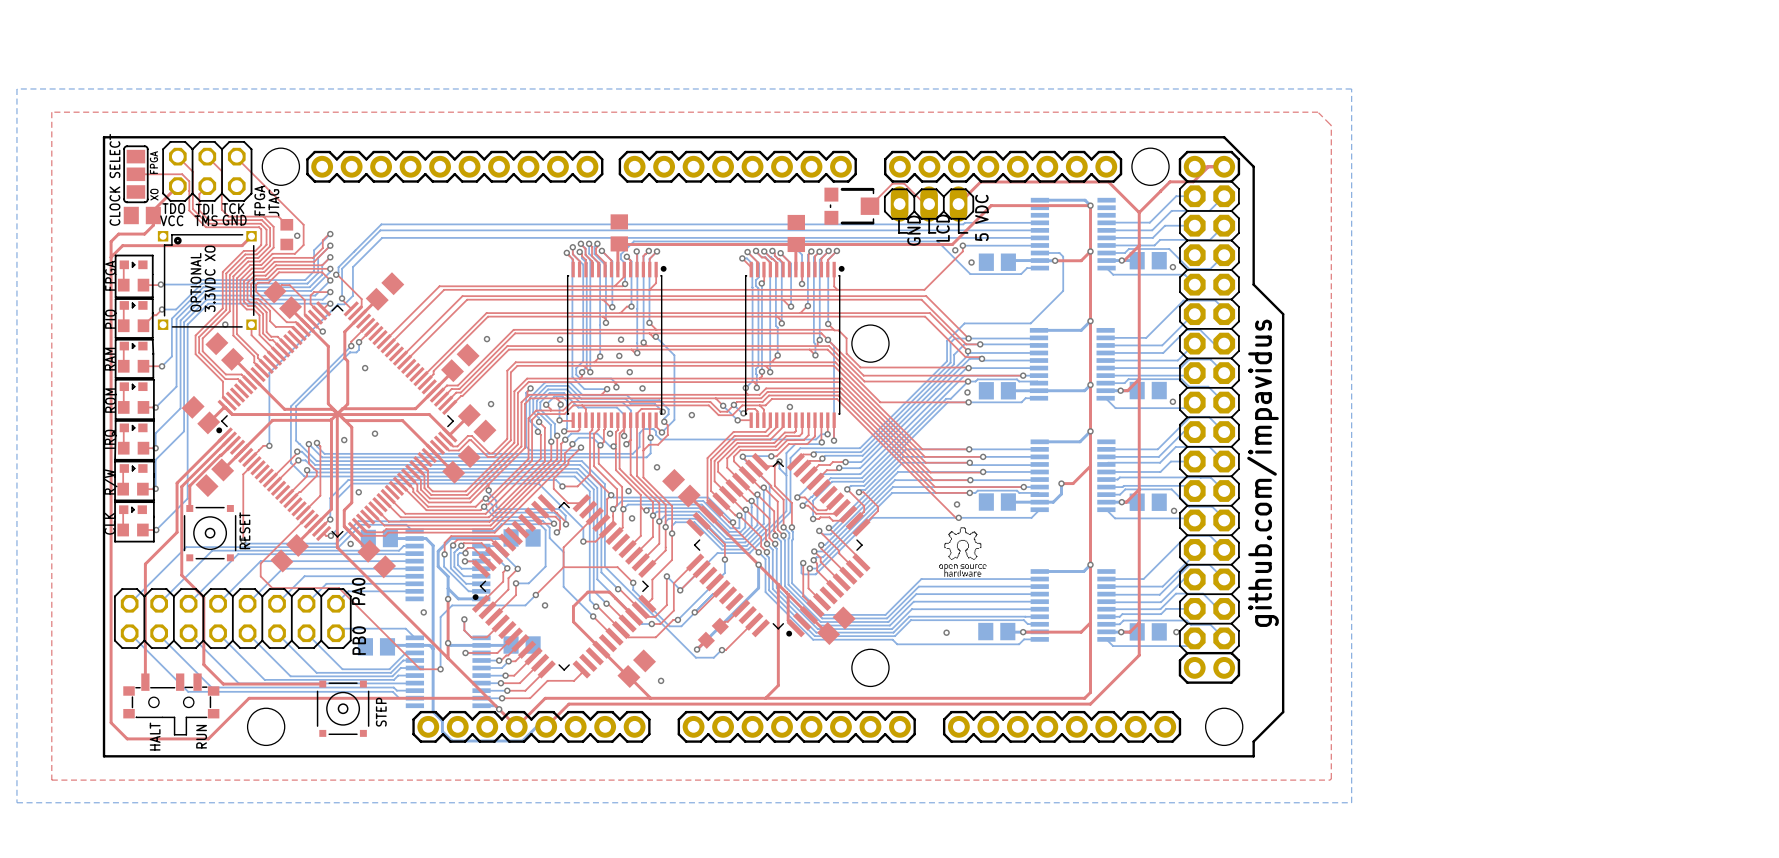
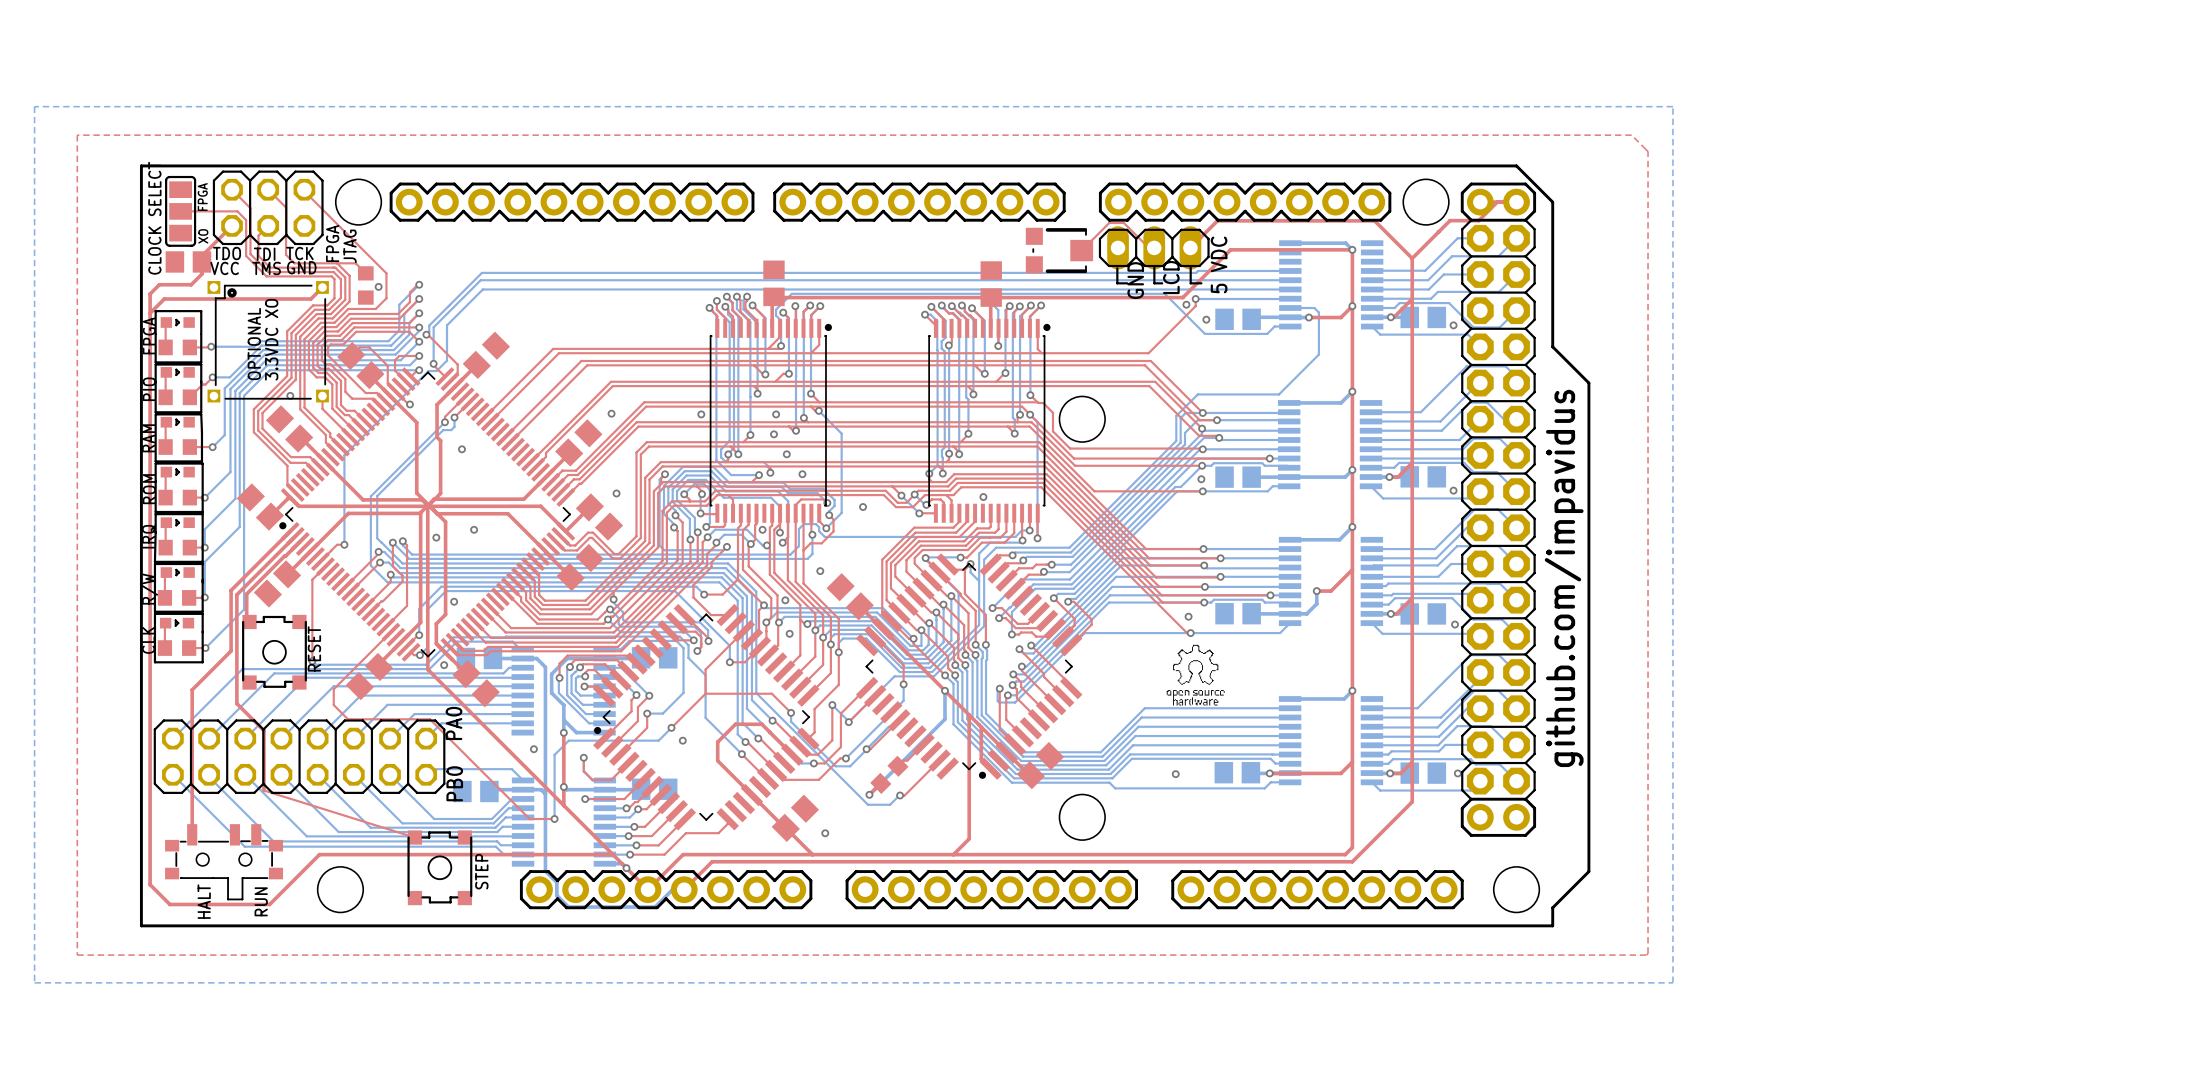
part footprint: [183, 504, 237, 562] -> [242, 614, 307, 690]
top track: (203, 646) (203, 664) (223, 684) (322, 684) -> (263, 790) (414, 837)
part footprint: [316, 680, 370, 737] -> [407, 830, 473, 906]

